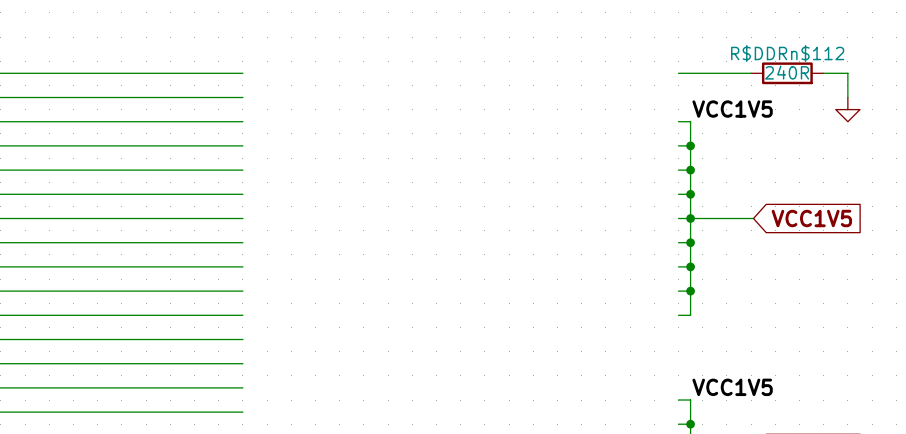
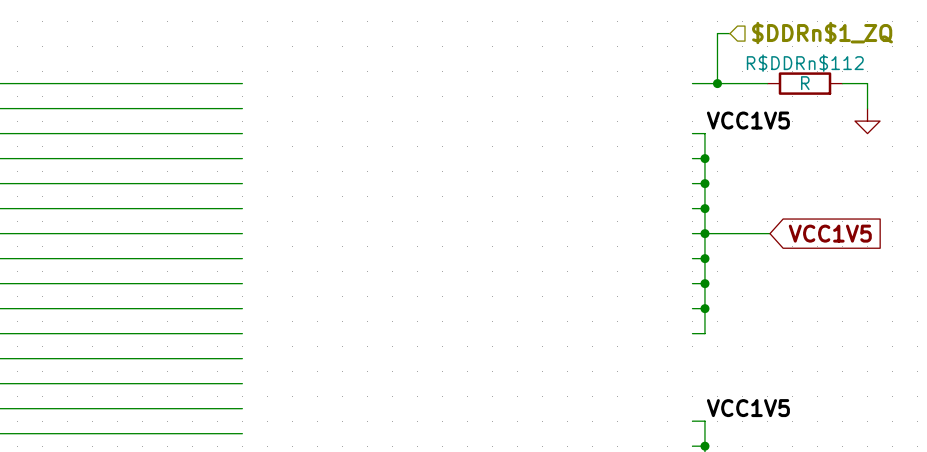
wire: none -> (729, 33) (717, 33) (717, 83)
hierarchical label: none -> $DDRn$1_ZQ (822, 33)
R$DDRn$112 value: 240R (787, 72) -> R (805, 83)
junction: none -> (717, 83)

